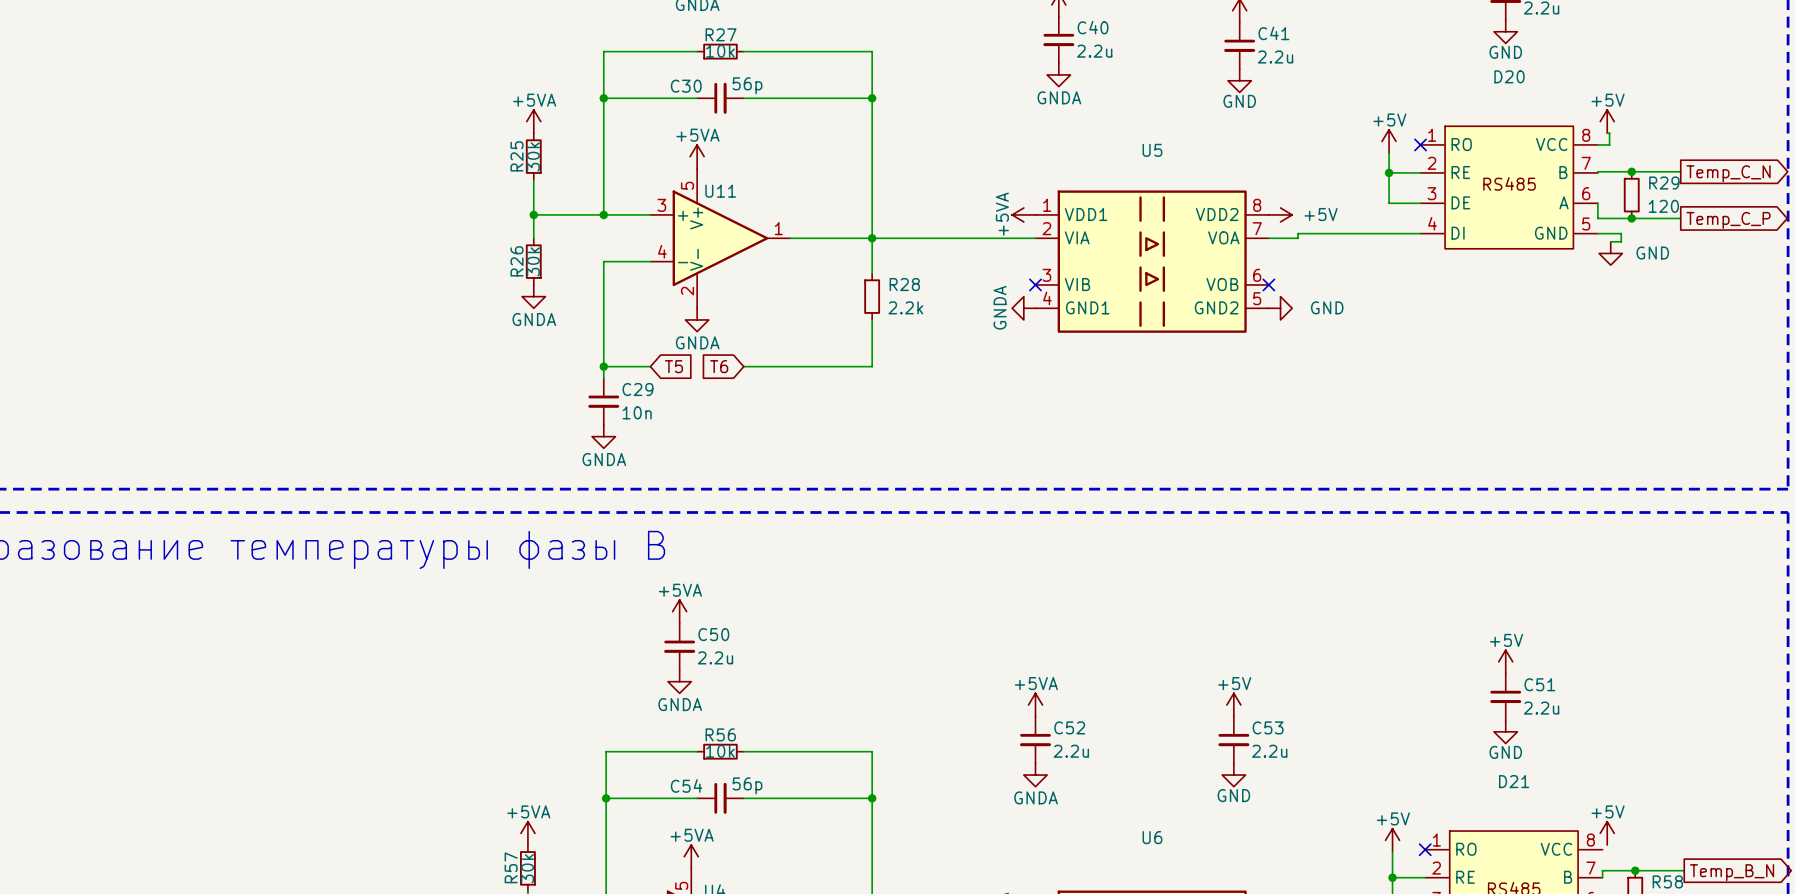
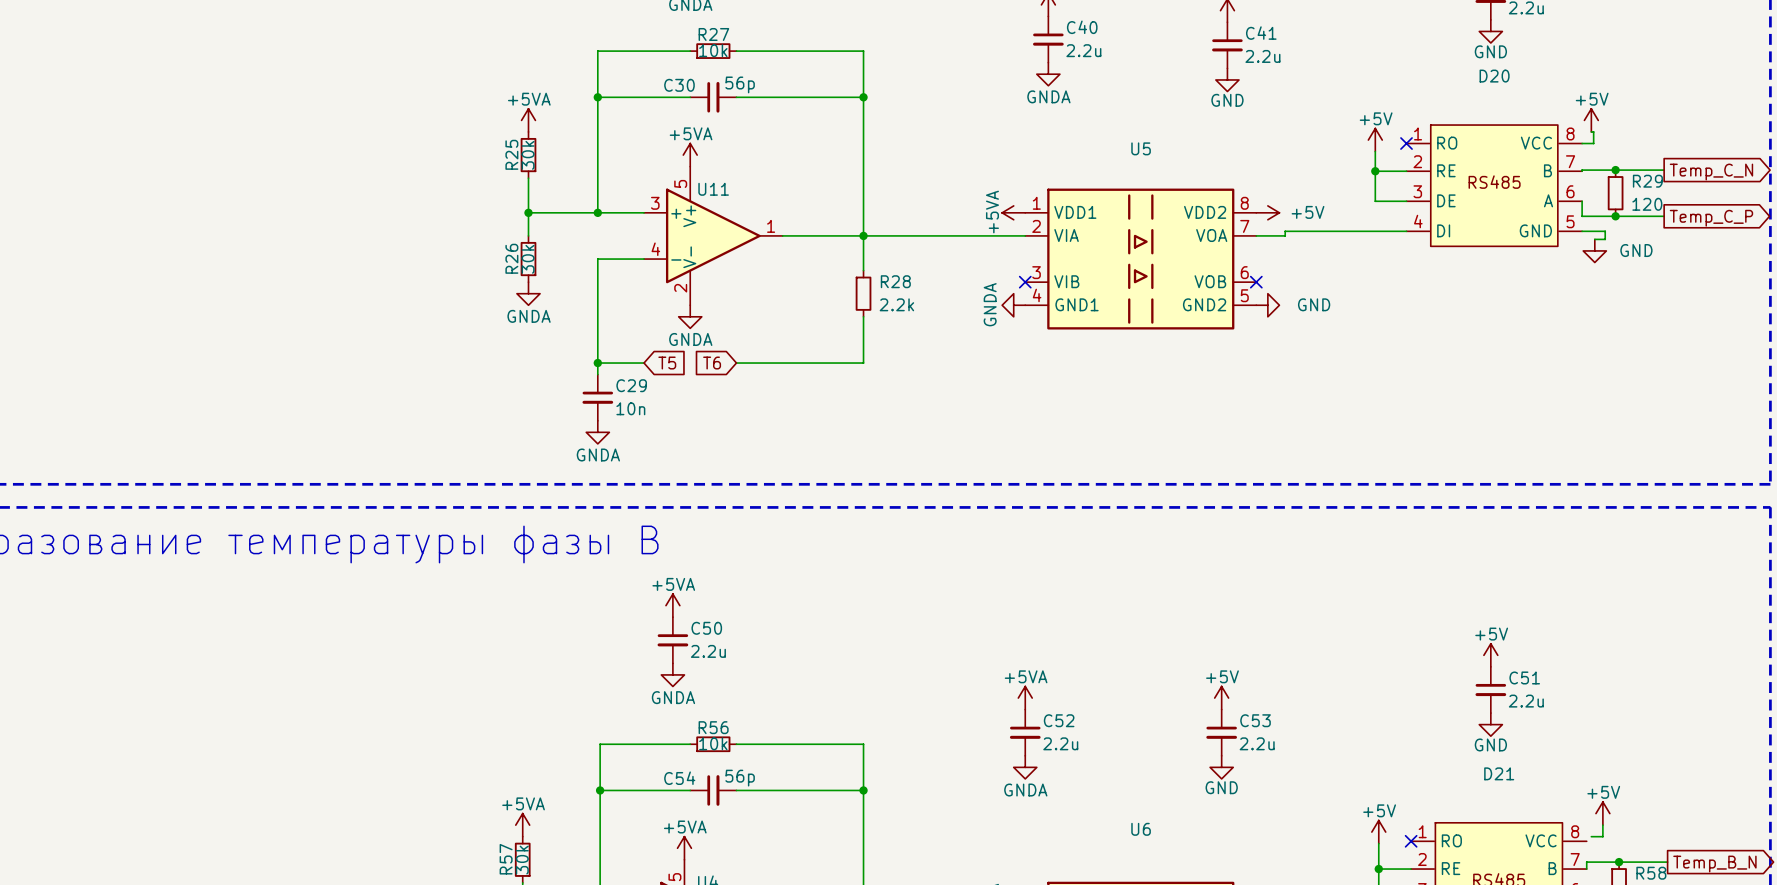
power symbol position: +5V (1607, 833) -> +5V (1602, 813)
wire: none -> (1602, 825) (1602, 836) (1591, 836)

